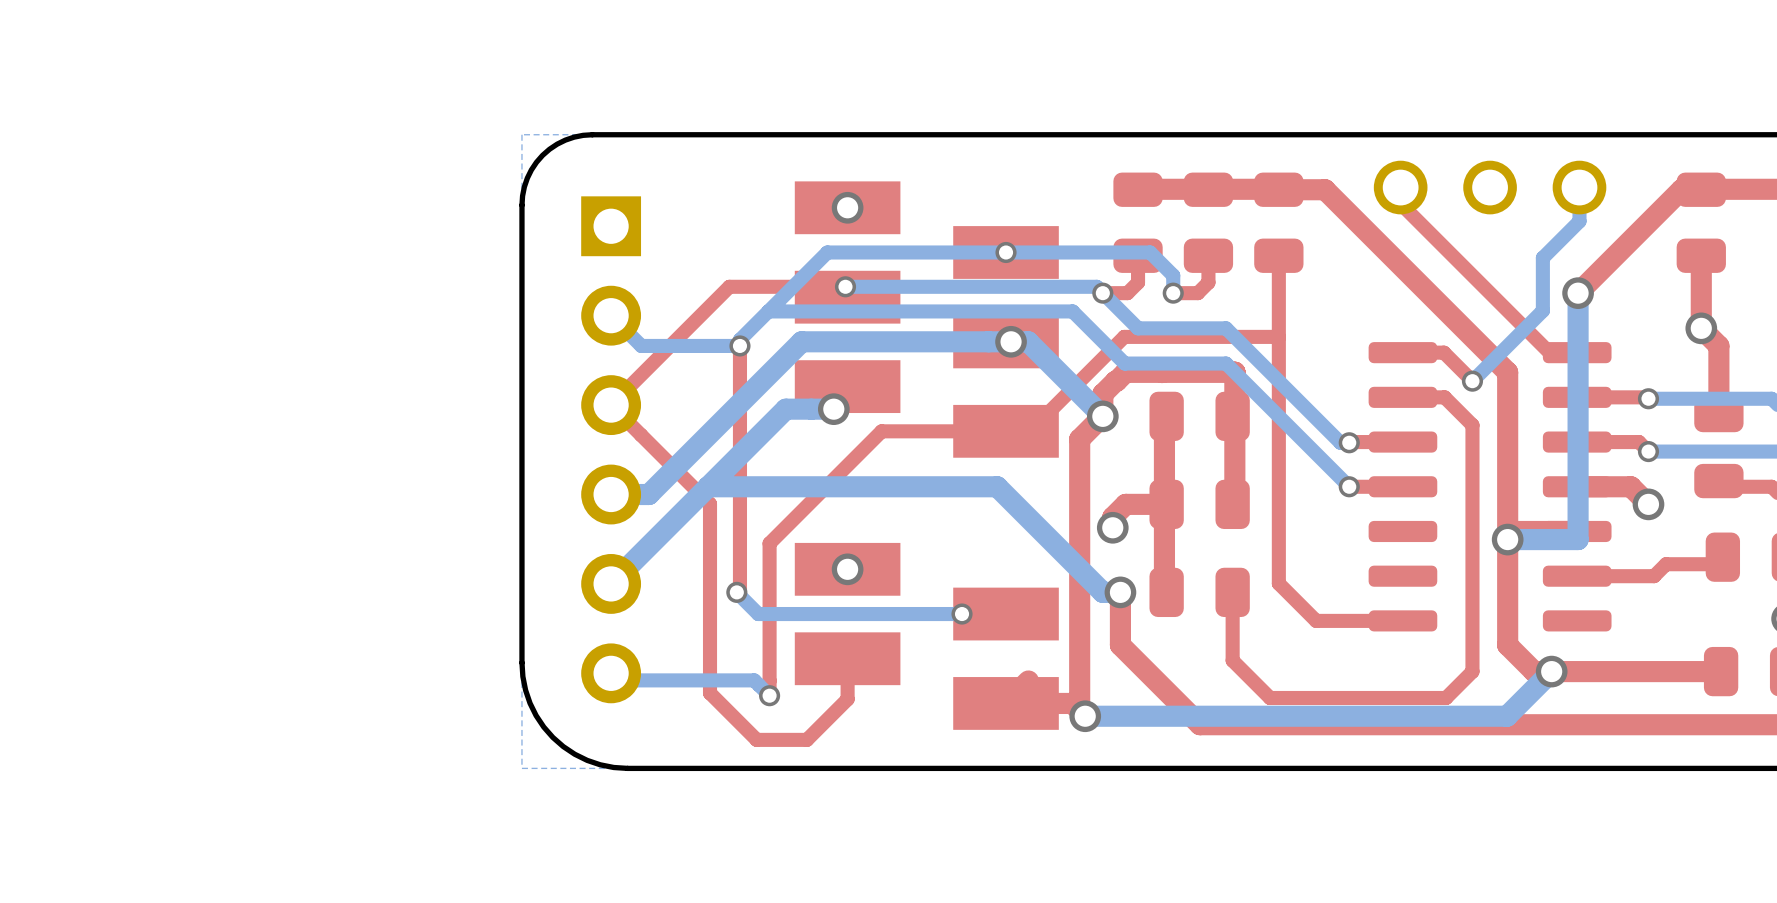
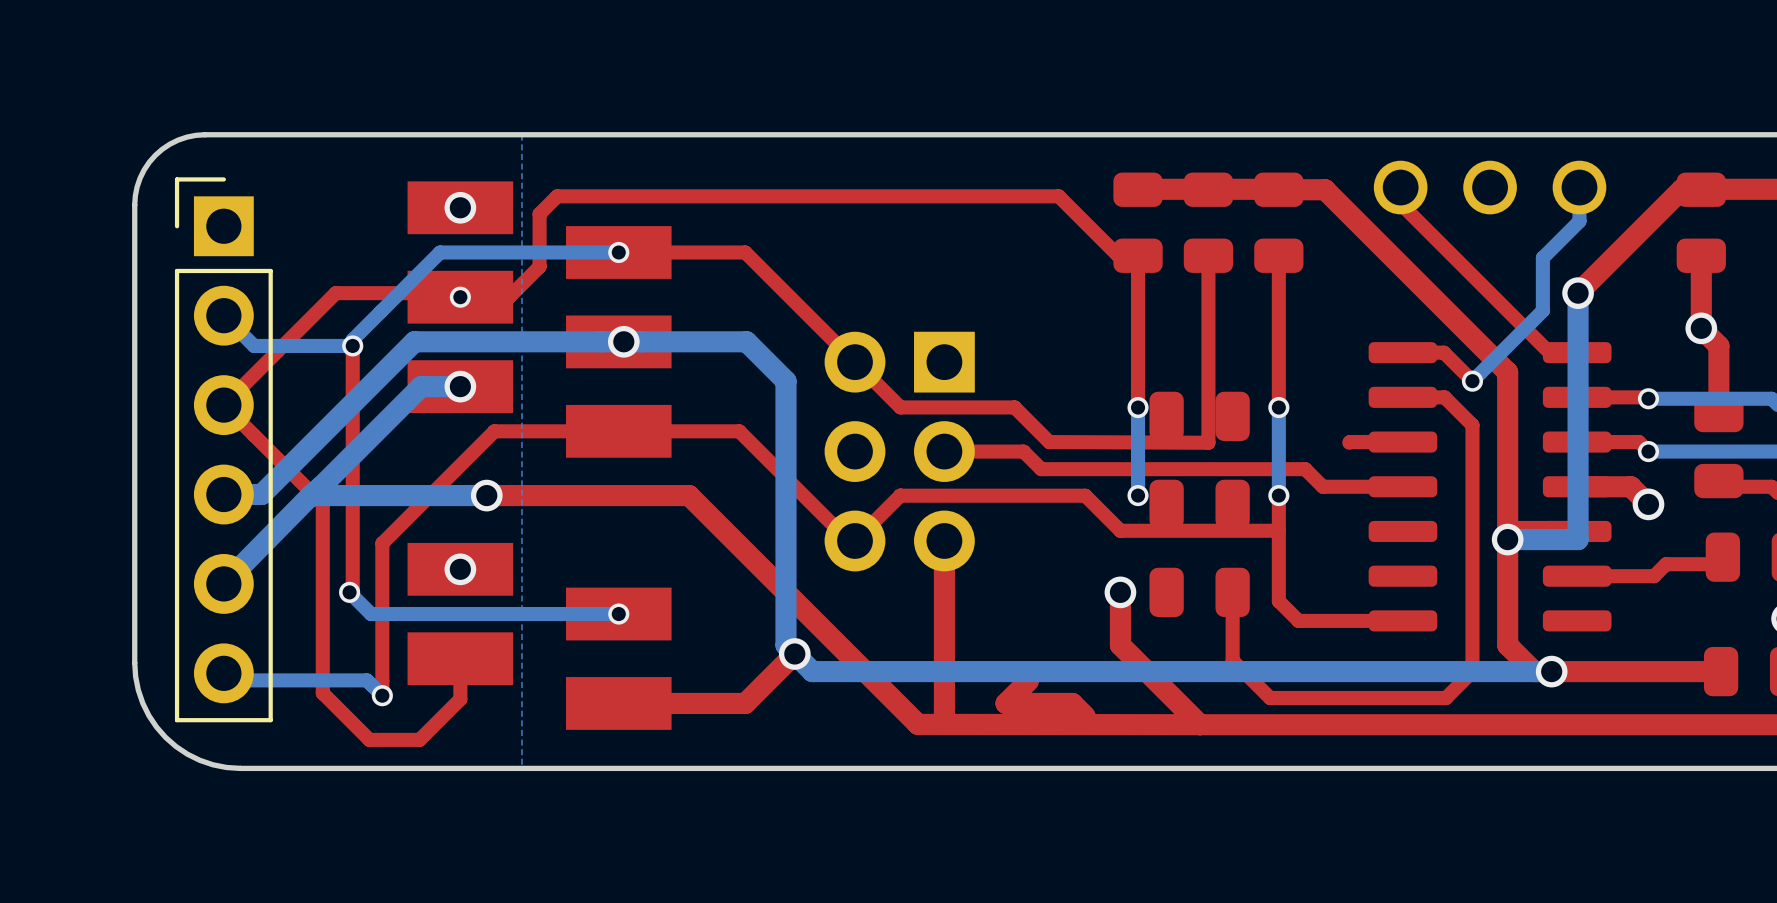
board edge: (592, 134) (565, 140) (542, 155) (527, 178) (522, 195) (521, 662) (522, 676) (530, 703) (543, 727) (552, 737) (563, 746) (587, 760) (613, 767) (627, 768) -> (592, 134) (205, 134) (186, 137) (169, 144) (149, 162) (140, 178) (134, 205) (134, 662) (135, 676) (142, 703) (156, 727) (176, 746) (187, 754) (213, 764) (240, 768) (627, 768)
via: none -> (460, 207)
via: (847, 207) -> none
top track: none -> (618, 252) (745, 252) (855, 362)
bottom track: none -> (618, 252) (440, 252) (352, 339) (352, 345) (254, 345) (223, 315)
via: none -> (618, 252)
via: (1006, 252) -> none
top track: none -> (1138, 255) (1118, 255) (1058, 196) (557, 196) (539, 213) (539, 266) (509, 297) (460, 297) (456, 293) (335, 293) (223, 405) (322, 503) (322, 693) (369, 739) (419, 739) (460, 699) (460, 658)
top track: (1138, 282) (1127, 293) (1102, 293) -> (1138, 282) (1138, 407)
top track: (1208, 282) (1197, 293) (1173, 293) -> (1208, 282) (1208, 442) (1049, 442) (1014, 407) (900, 407) (855, 362)
top track: (845, 286) (729, 286) (611, 405) (710, 503) (710, 693) (756, 739) (806, 739) (847, 699) (847, 658) -> none
bottom track: (845, 286) (1096, 286) (1102, 292) -> none
via: (845, 286) -> none
bottom track: (1102, 293) (1138, 328) (1226, 328) (1340, 442) (1349, 442) -> none
via: (1102, 293) -> none
bottom track: (1173, 293) (1173, 275) (1150, 252) (827, 252) (739, 339) (739, 345) (641, 345) (611, 315) -> none
via: (1173, 293) -> none
via: none -> (460, 297)
bottom track: (768, 311) (1072, 311) (1124, 363) (1226, 363) (1349, 486) -> none
part position: (926, 319) -> (539, 319)
top track: (1278, 336) (1124, 336) (1029, 431) (881, 431) (769, 543) (769, 695) -> none
via: none -> (623, 341)
via: (1011, 341) -> none
via: none -> (352, 345)
top track: (739, 345) (739, 589) (736, 592) -> (352, 345) (352, 589) (349, 592)
via: (739, 345) -> none
bottom track: none -> (460, 386) (421, 386) (310, 495)
via: none -> (460, 386)
bottom track: none -> (1138, 407) (1138, 495)
via: none -> (1138, 407)
top track: (1278, 407) (1278, 495) -> none
bottom track: none -> (1278, 407) (1278, 495)
via: none -> (1278, 407)
bottom track: (833, 409) (785, 409) (611, 583) -> none
via: (833, 409) -> none
top track: (1102, 415) (1102, 393) (1125, 372) (1234, 372) (1234, 504) -> none
top track: (1102, 416) (1079, 439) (1079, 710) -> none
bottom track: (1102, 416) (1028, 341) (801, 341) (648, 494) (611, 494) -> none
via: (1102, 416) -> none
top track: (1164, 416) (1164, 592) -> none
via: (1349, 442) -> none
part side: top (611, 449) -> bottom (223, 449)
part: none -> (899, 451)
top track: none -> (944, 451) (1023, 451) (1041, 469) (1305, 469) (1322, 486) (1349, 486)
bottom track: (708, 486) (997, 486) (1102, 592) (1120, 592) -> none
via: (1349, 486) -> none
bottom track: none -> (310, 495) (223, 583)
top track: none -> (486, 495) (689, 495) (918, 724) (944, 724)
bottom track: none -> (486, 495) (310, 495)
via: none -> (486, 495)
via: none -> (1138, 495)
via: none -> (1278, 495)
top track: (1164, 504) (1125, 504) (1112, 517) (1112, 527) -> none
via: (1112, 527) -> none
top track: none -> (1278, 530) (1120, 530) (1085, 495) (900, 495) (855, 540) (849, 540) (739, 431) (494, 431) (382, 543) (382, 695)
top track: none -> (944, 540) (944, 724)
via: none -> (460, 569)
via position: (847, 569) -> (794, 653)
top track: (1278, 583) (1316, 620) -> (1278, 583) (1278, 601) (1298, 620) (1316, 620)
bottom track: none -> (349, 592) (371, 614) (618, 614)
via: none -> (349, 592)
bottom track: (736, 592) (758, 614) (962, 614) -> none
via: (736, 592) -> none
via: none -> (618, 614)
via: (962, 614) -> none
part position: (926, 636) -> (539, 636)
top track: none -> (794, 653) (745, 703) (618, 703)
bottom track: (1551, 671) (1507, 716) (1085, 716) -> (1551, 671) (812, 671) (786, 645) (786, 381) (746, 341) (414, 341) (261, 494) (223, 494)
bottom track: (611, 673) (618, 680) (754, 680) (769, 695) -> (223, 673) (230, 680) (367, 680) (382, 695)
via: none -> (382, 695)
via: (769, 695) -> none
via: (1085, 716) -> none
top track: none -> (944, 724) (1199, 724)

